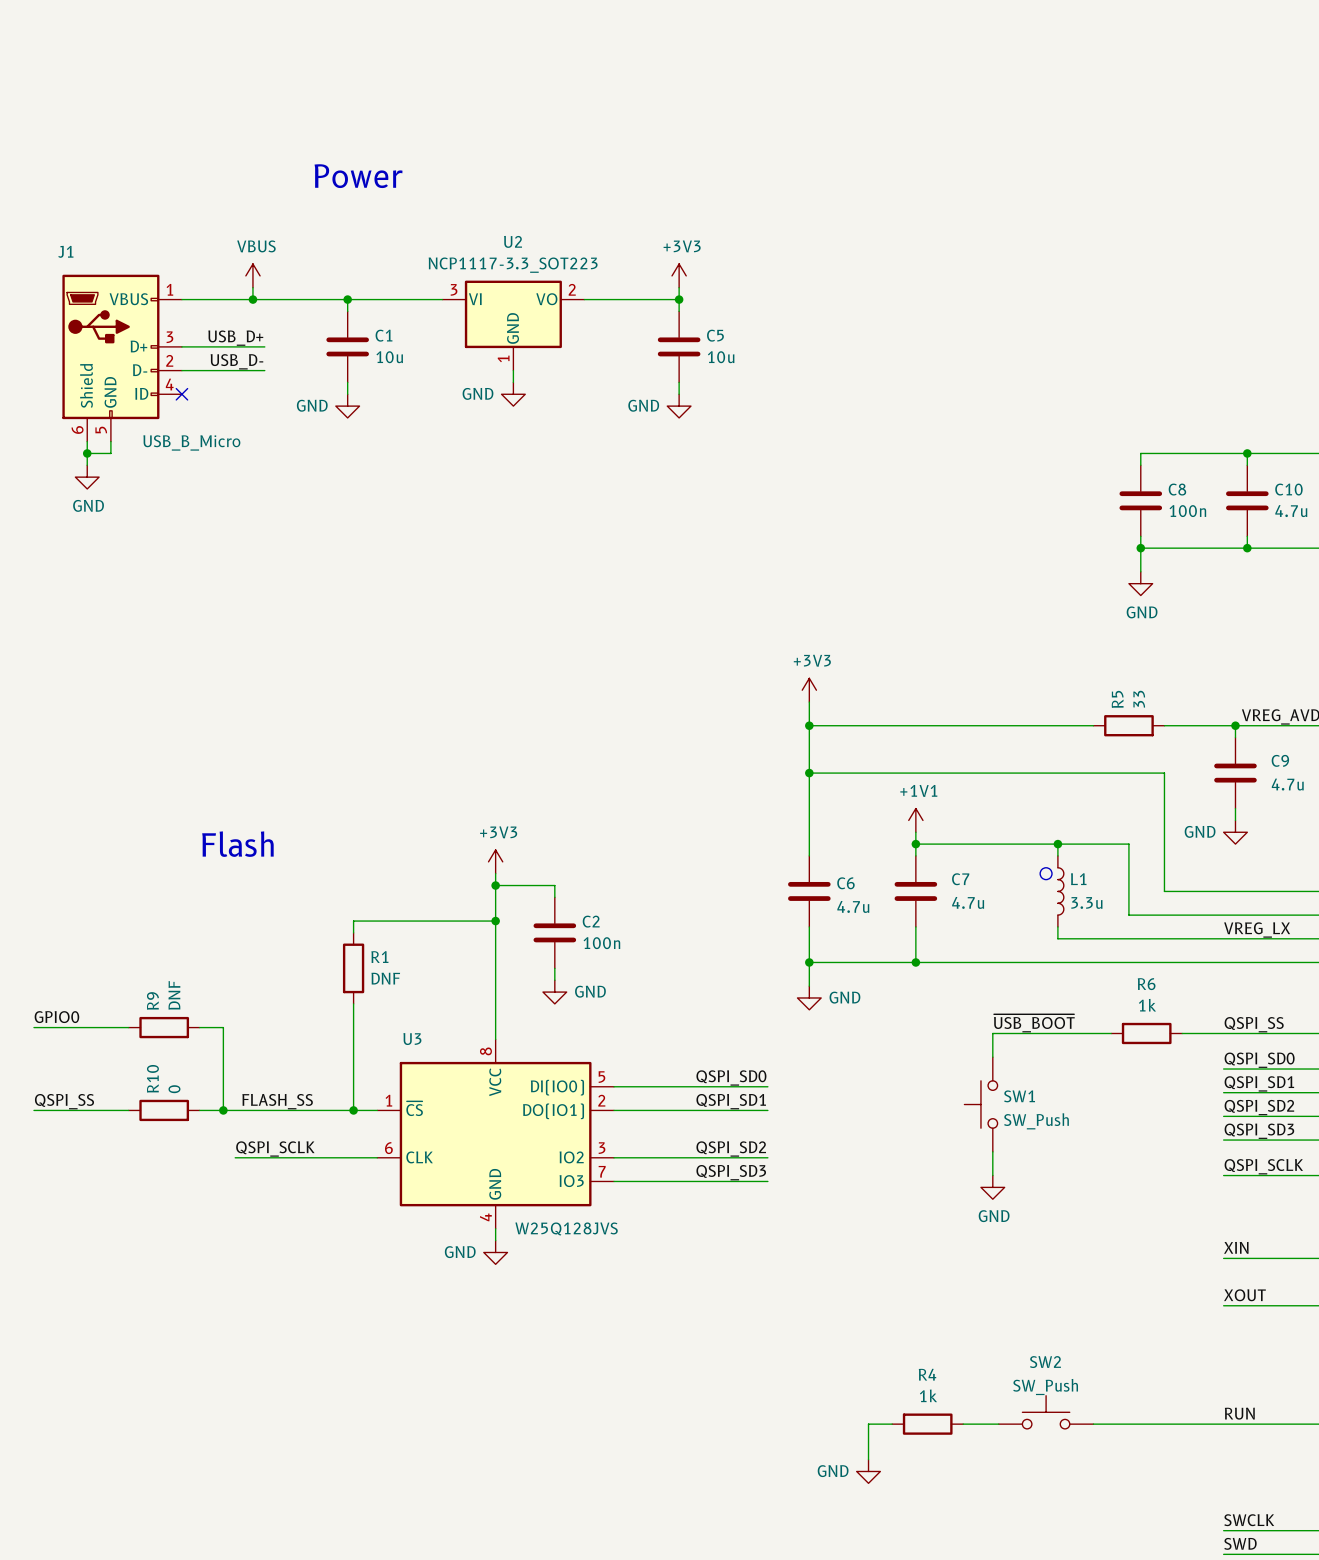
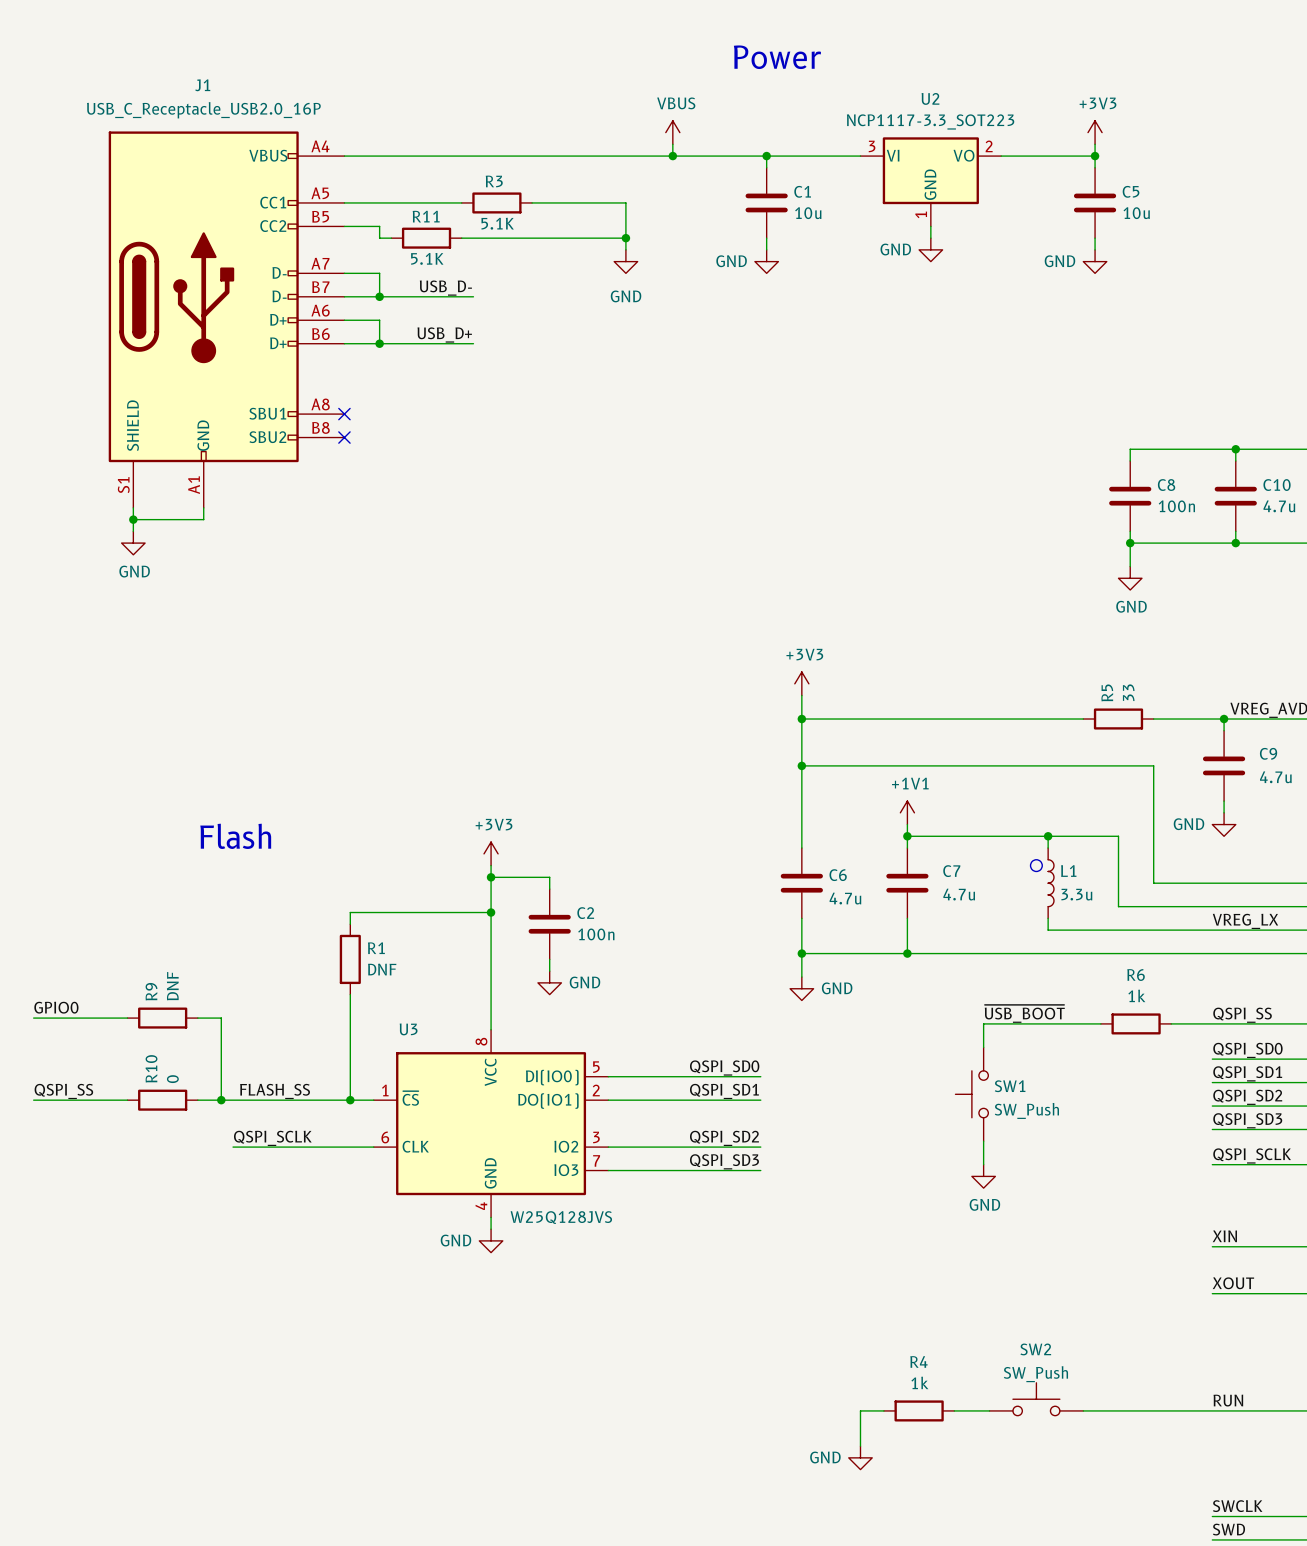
text: none -> Power (777, 57)
power symbol: none -> VBUS (672, 132)
power symbol: none -> +3V3 (1095, 132)
wire: none -> (672, 144) (672, 156)
wire: none -> (1095, 144) (1095, 167)
wire: none -> (344, 156) (860, 156)
junction: none -> (672, 156)
wire: none -> (766, 156) (766, 167)
junction: none -> (766, 156)
wire: none -> (1001, 156) (1095, 156)
junction: none -> (1095, 156)
text: Power (358, 176) -> none
wire: none -> (344, 202) (461, 202)
R3: none -> 5.1K (496, 202)
wire: none -> (532, 202) (625, 202) (625, 249)
wire: none -> (344, 226) (379, 226) (379, 238) (391, 238)
wire: none -> (930, 226) (930, 238)
R11: none -> 5.1K (426, 238)
wire: none -> (461, 238) (625, 238)
junction: none -> (625, 238)
wire: none -> (1095, 238) (1095, 249)
J1 name position: J1 (65, 251) -> J1 (202, 85)
power symbol: none -> GND (930, 249)
power symbol: none -> GND (625, 261)
power symbol: none -> GND (766, 261)
power symbol: none -> GND (1095, 261)
J1 symbol: [62, 274, 182, 442] -> [108, 131, 345, 508]
power symbol: VBUS (252, 275) -> none
wire: none -> (344, 273) (379, 273) (379, 296)
power symbol: +3V3 (679, 275) -> none
wire: (679, 287) (679, 311) -> none
junction: (252, 299) -> none
junction: (347, 299) -> none
junction: none -> (379, 296)
wire: (584, 299) (679, 299) -> none
junction: (679, 299) -> none
wire: none -> (344, 320) (379, 320) (379, 343)
U2 position: (513, 325) -> (930, 181)
label position: USB_D+ (235, 338) -> USB_D+ (444, 335)
wire: none -> (344, 343) (473, 343)
C1 position: (347, 346) -> (766, 202)
junction: none -> (379, 343)
C5 position: (679, 346) -> (1095, 202)
label position: USB_D- (236, 361) -> USB_D- (445, 288)
wire: (513, 370) (513, 382) -> none
wire: (347, 382) (347, 394) -> none
wire: (679, 382) (679, 394) -> (766, 238) (766, 249)
no-connect mark: (181, 394) -> none
power symbol: GND (513, 394) -> none
power symbol: GND (347, 406) -> none
power symbol: GND (679, 406) -> none
no-connect mark: none -> (344, 414)
wire: (87, 441) (87, 465) -> (133, 507) (133, 531)
wire: (110, 441) (110, 453) (87, 453) -> none
no-connect mark: none -> (344, 437)
J1 value: USB_B_Micro (191, 442) -> USB_C_Receptacle_USB2.0_16P (203, 110)
junction: (87, 453) -> none
power symbol position: GND (87, 477) -> GND (133, 543)
wire: none -> (203, 507) (203, 519) (133, 519)
junction: none -> (133, 519)

